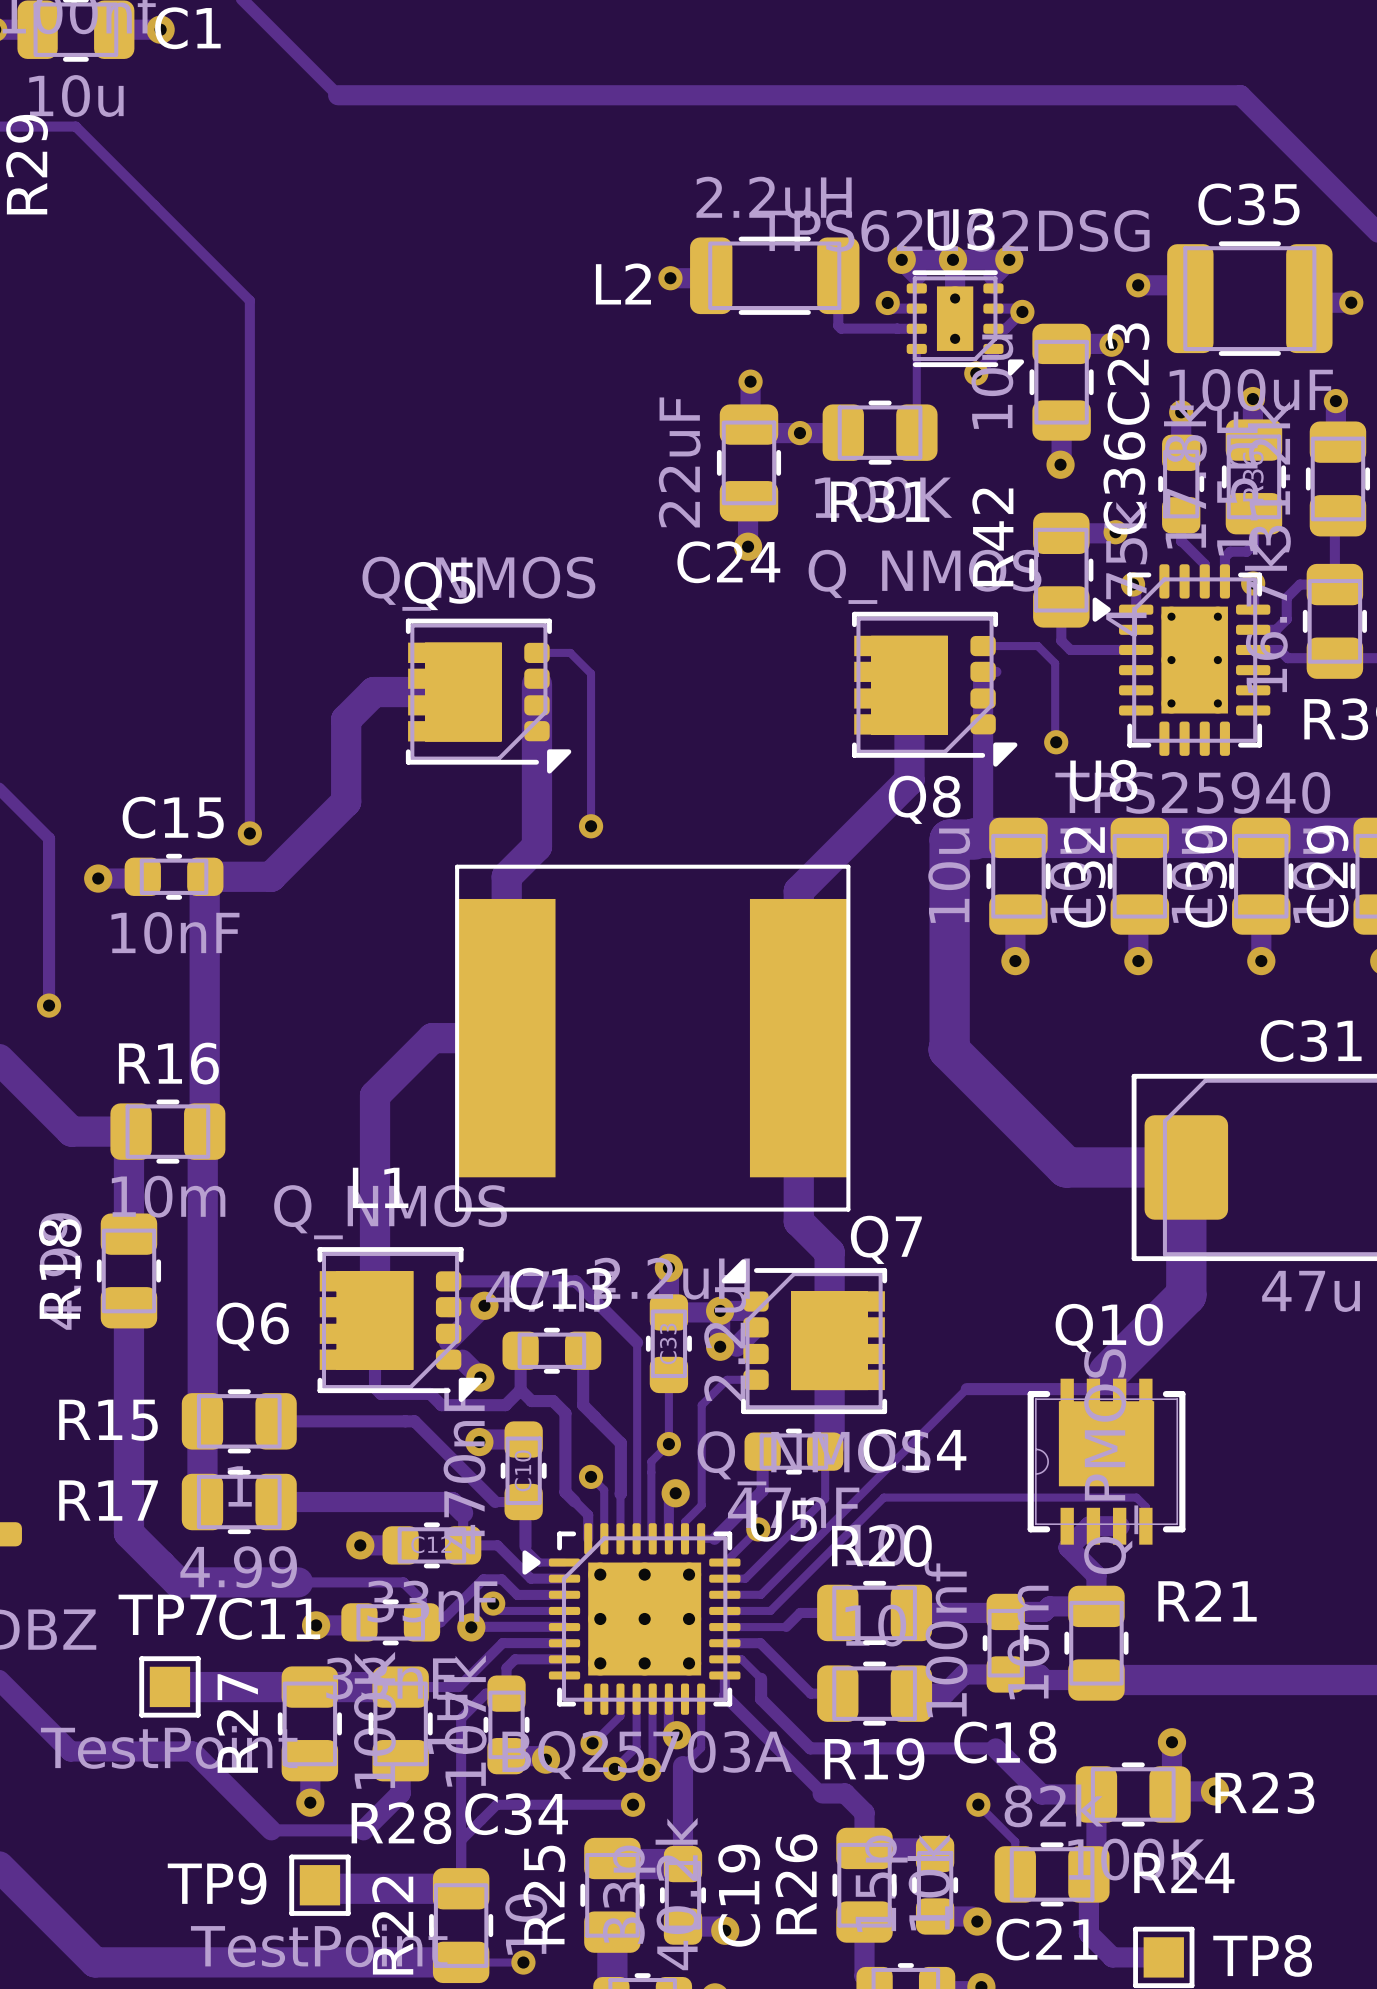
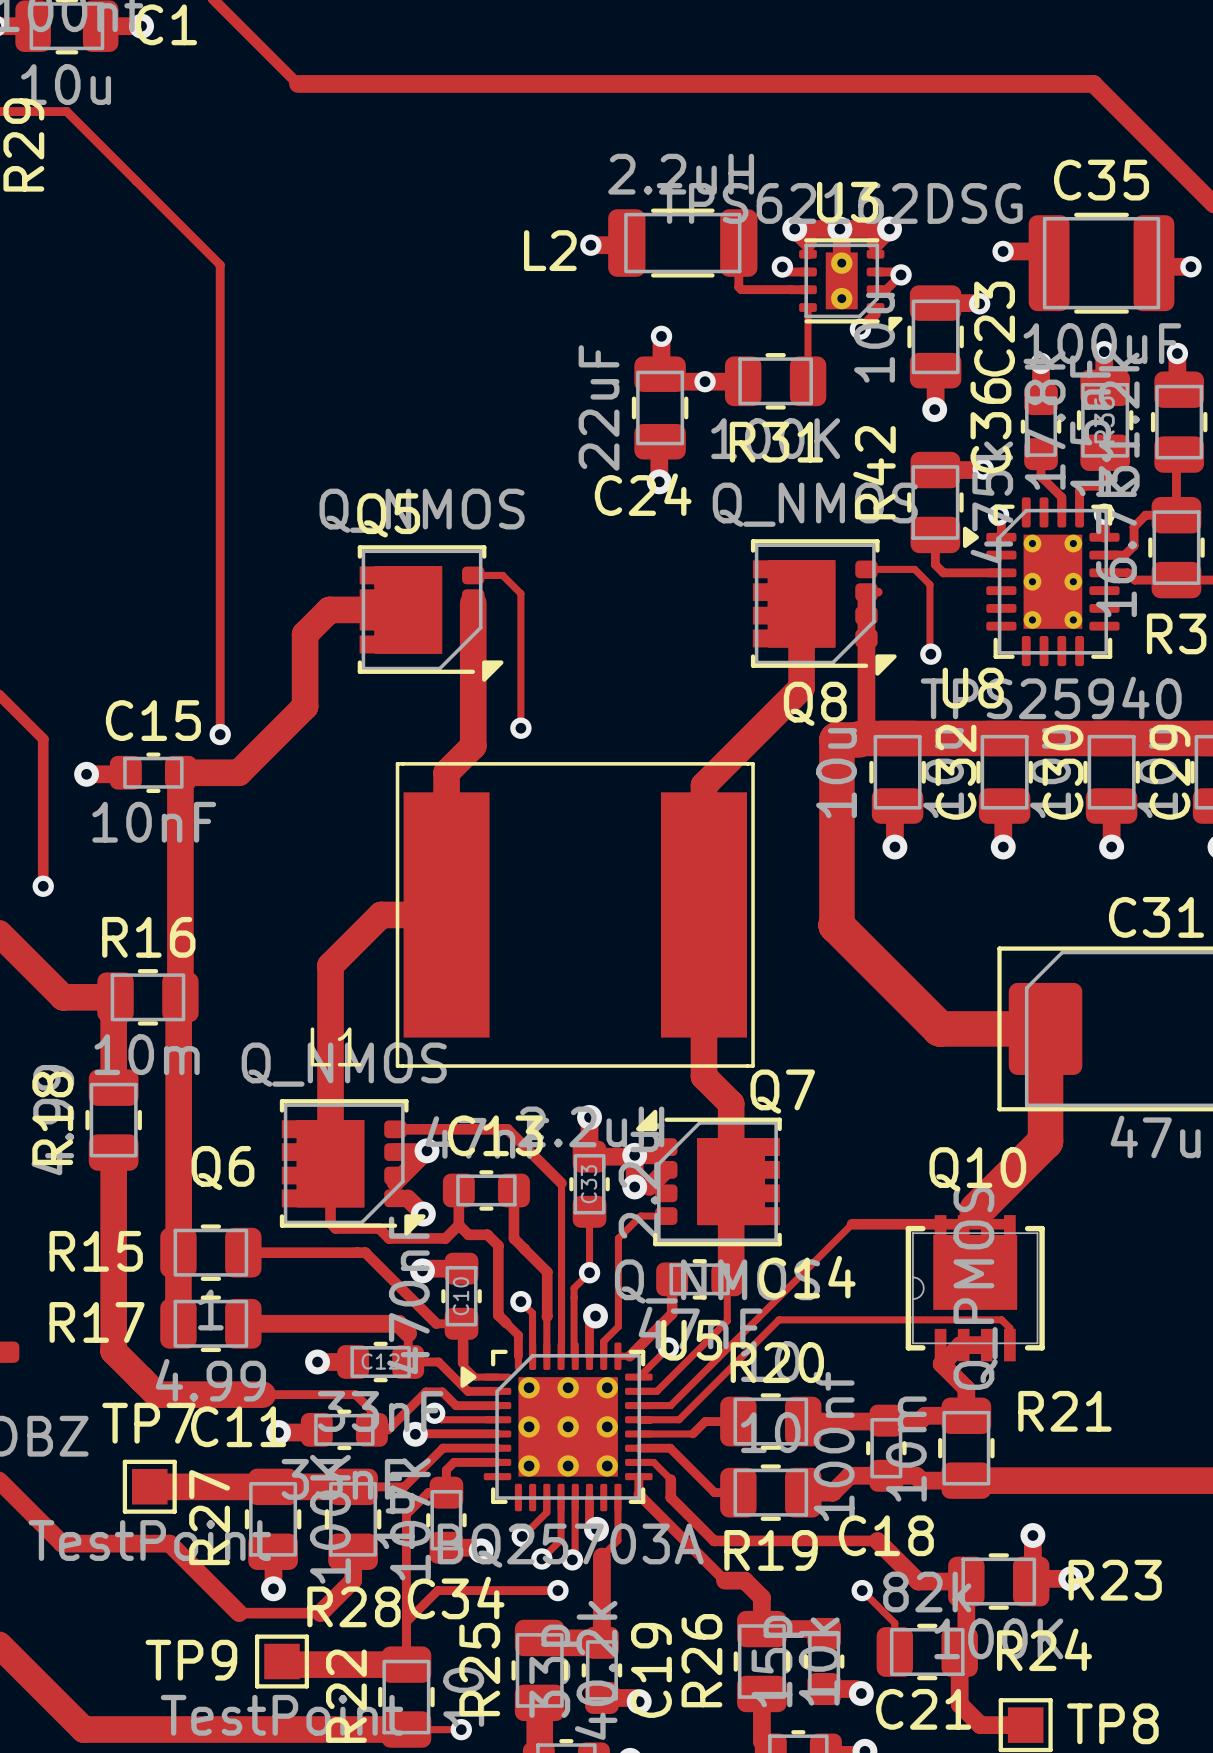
L1 footprint: [455, 864, 851, 1212] -> [395, 762, 755, 1068]

